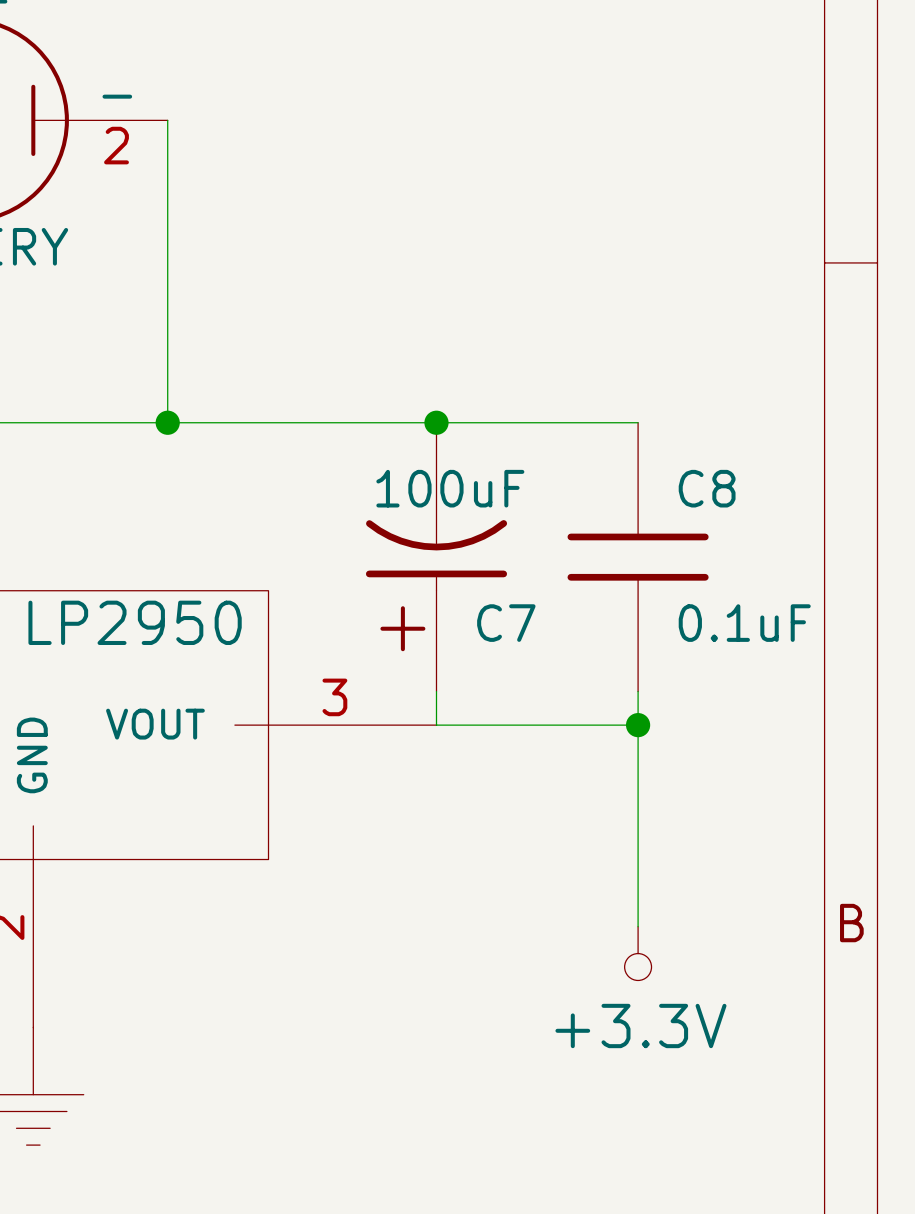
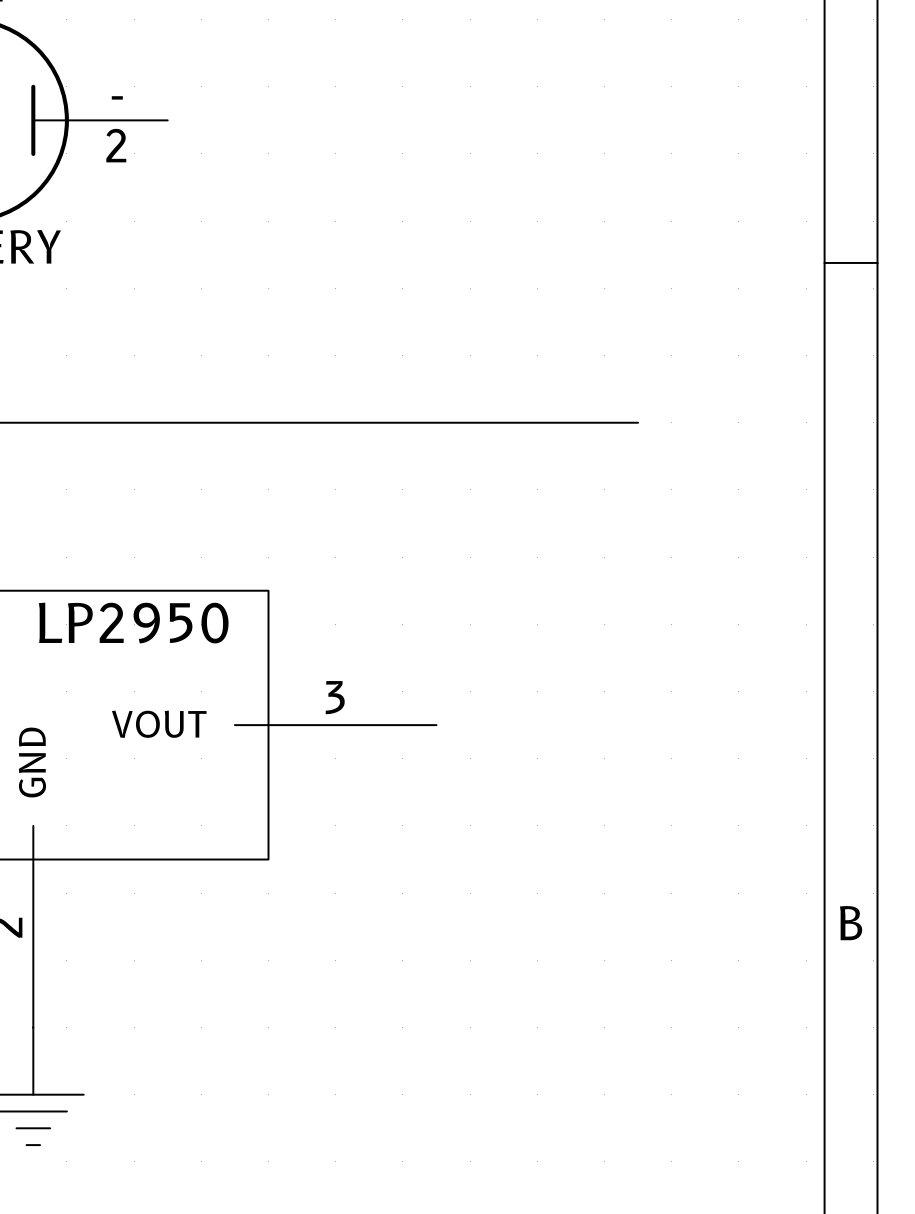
wire: (167, 120) (167, 422) -> none
junction: (167, 422) -> none
junction: (436, 422) -> none
C7: 100uF (436, 557) -> none
C8: 0.1uF (638, 557) -> none
wire: (436, 691) (436, 725) (638, 725) -> none
wire: (638, 691) (638, 926) -> none
junction: (638, 725) -> none
power symbol: +3.3V (638, 953) -> none

